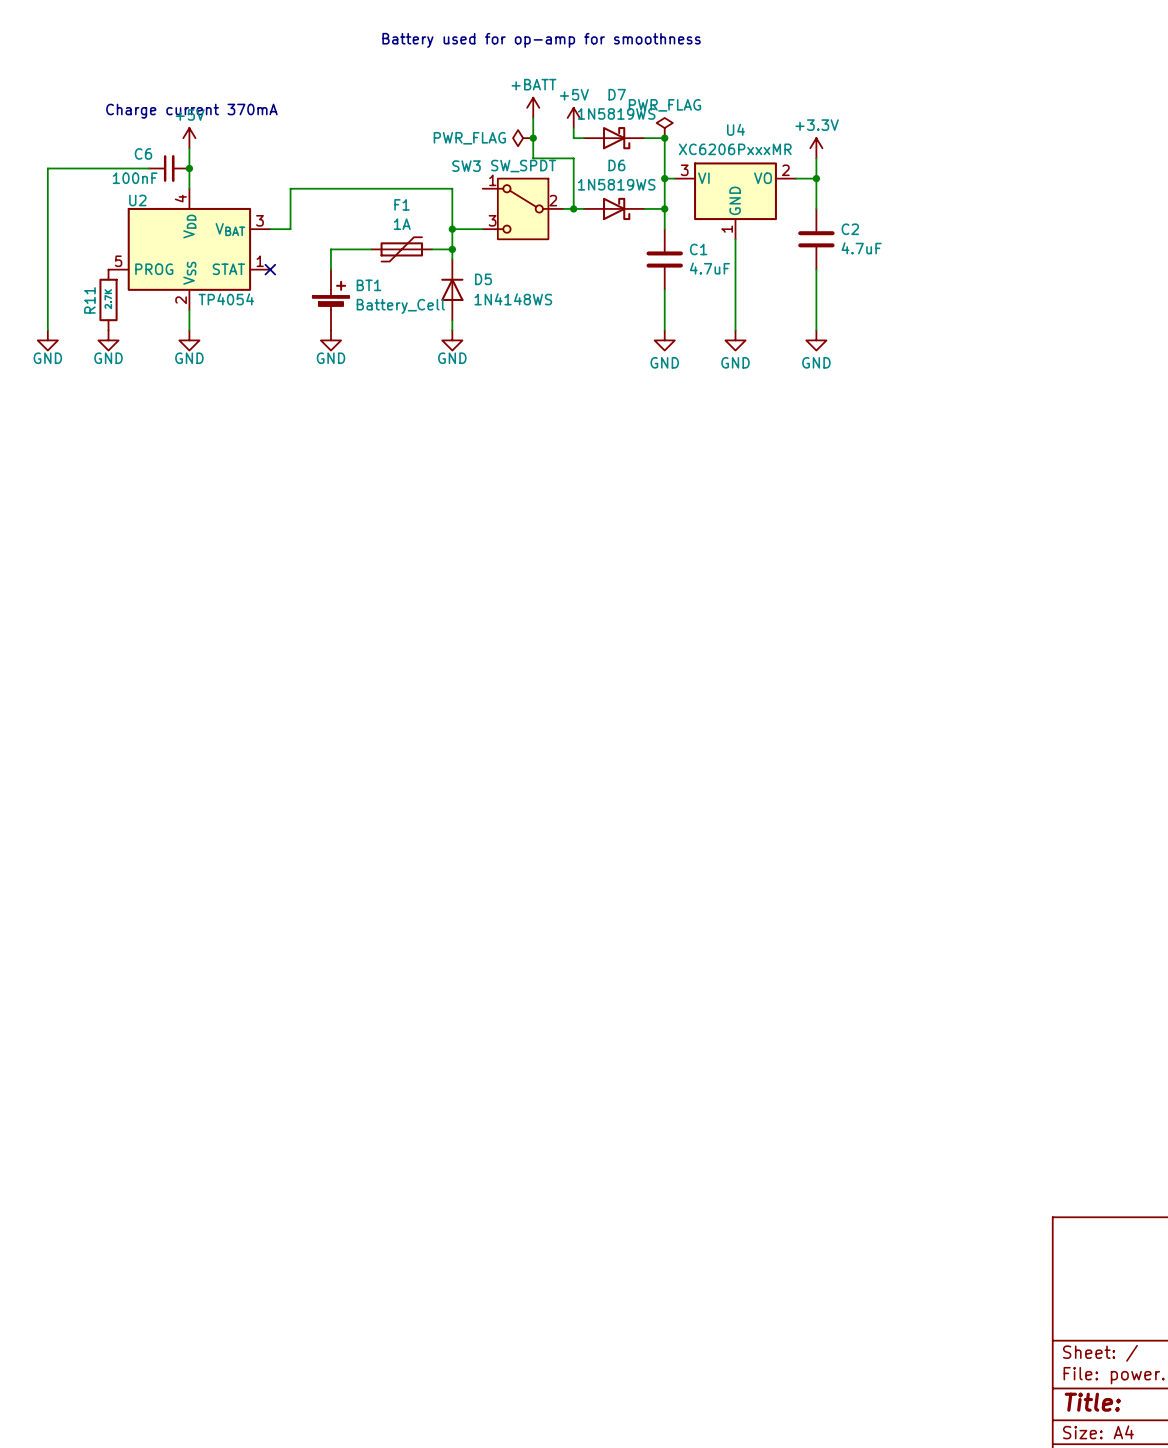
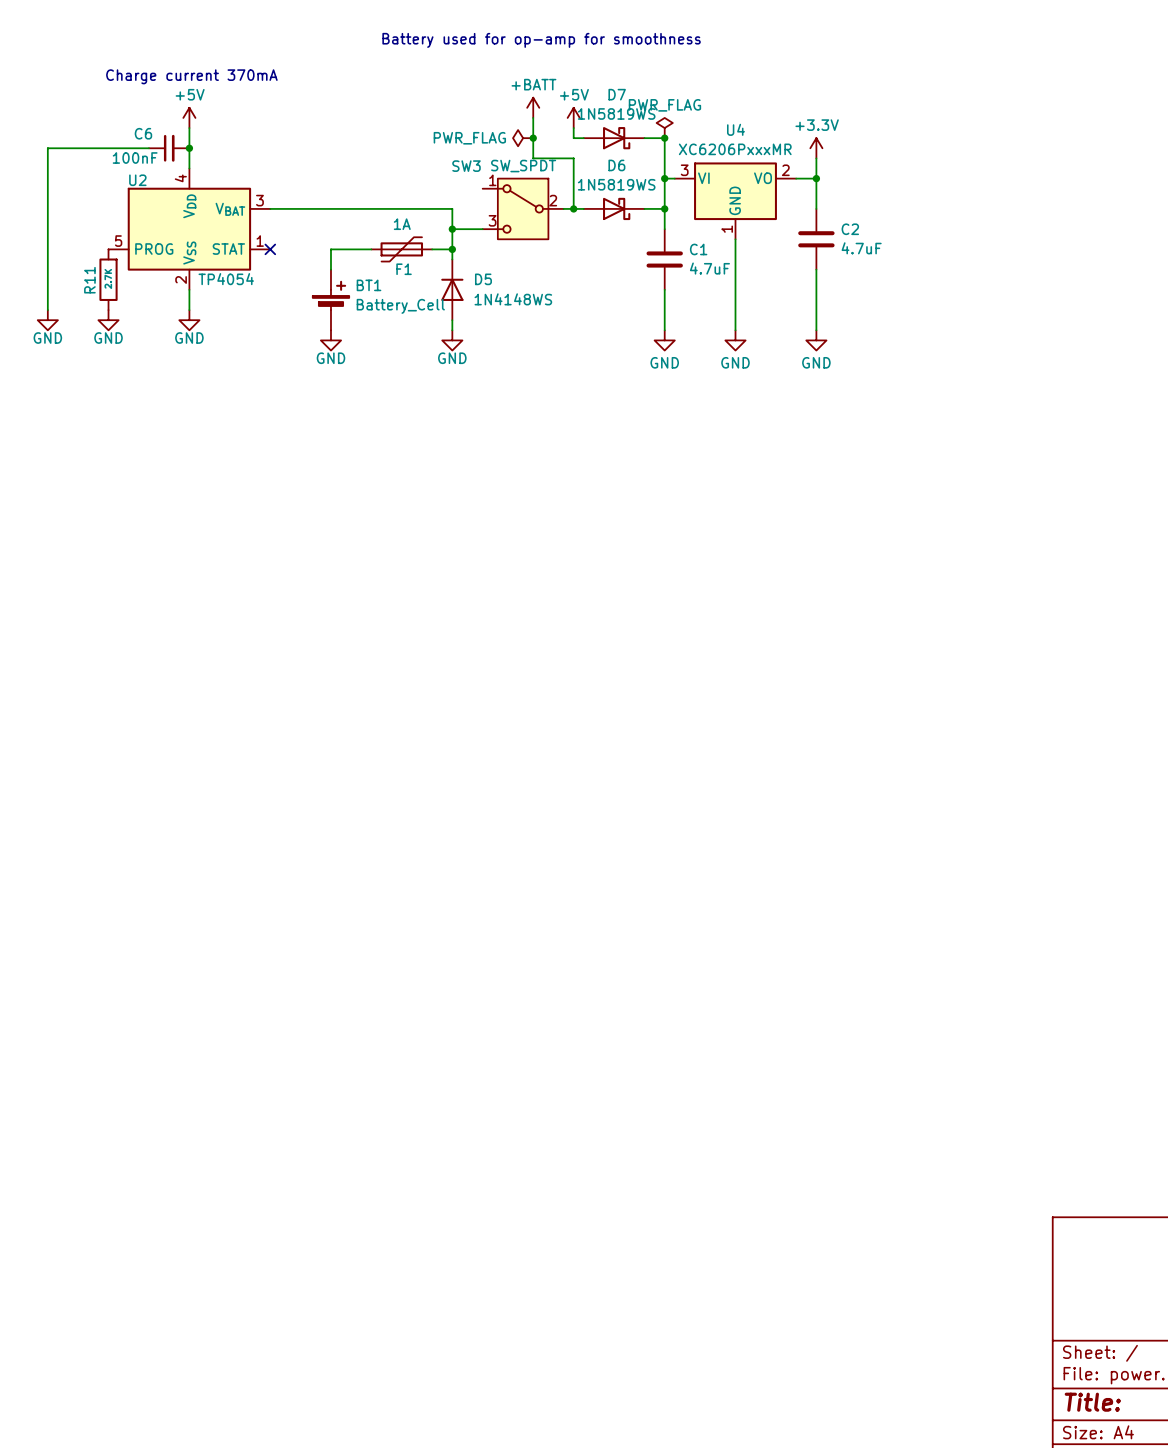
text position: Charge current 370mA (191, 111) -> Charge current 370mA (191, 76)
power symbol position: +5V (189, 138) -> +5V (189, 117)
wire: (47, 168) (148, 168) -> (47, 168) (47, 148) (148, 148)
C6 position: (169, 168) -> (169, 148)
junction position: (189, 168) -> (189, 148)
F1 name position: F1 (402, 204) -> F1 (404, 269)
wire: (452, 208) (452, 188) (290, 188) (290, 229) (270, 229) -> (452, 208) (270, 208)
U2 position: (189, 249) -> (189, 229)
no-connect mark position: (270, 269) -> (270, 249)
R11 position: (108, 299) -> (108, 279)
power symbol position: GND (47, 340) -> GND (47, 320)
power symbol position: GND (108, 340) -> GND (108, 320)
power symbol position: GND (189, 340) -> GND (189, 320)

